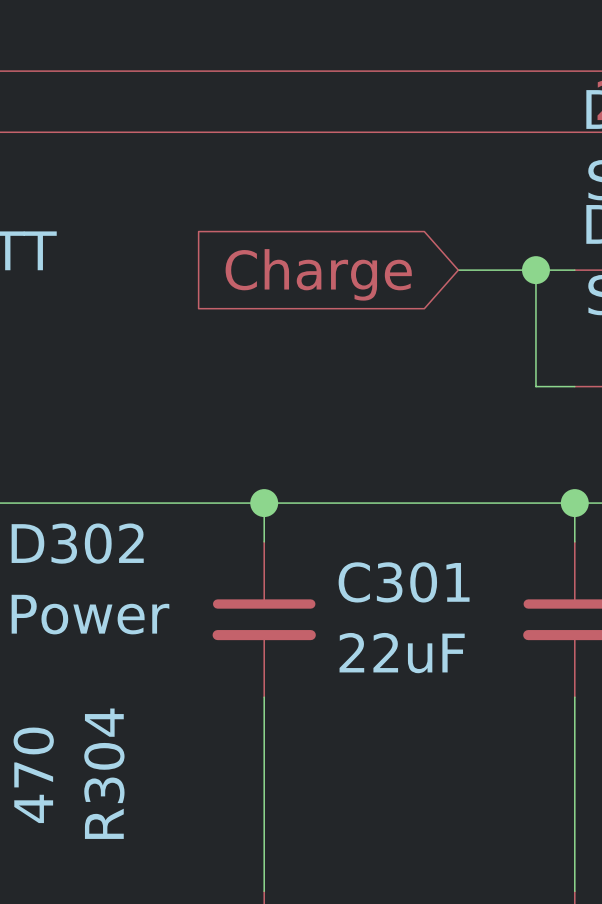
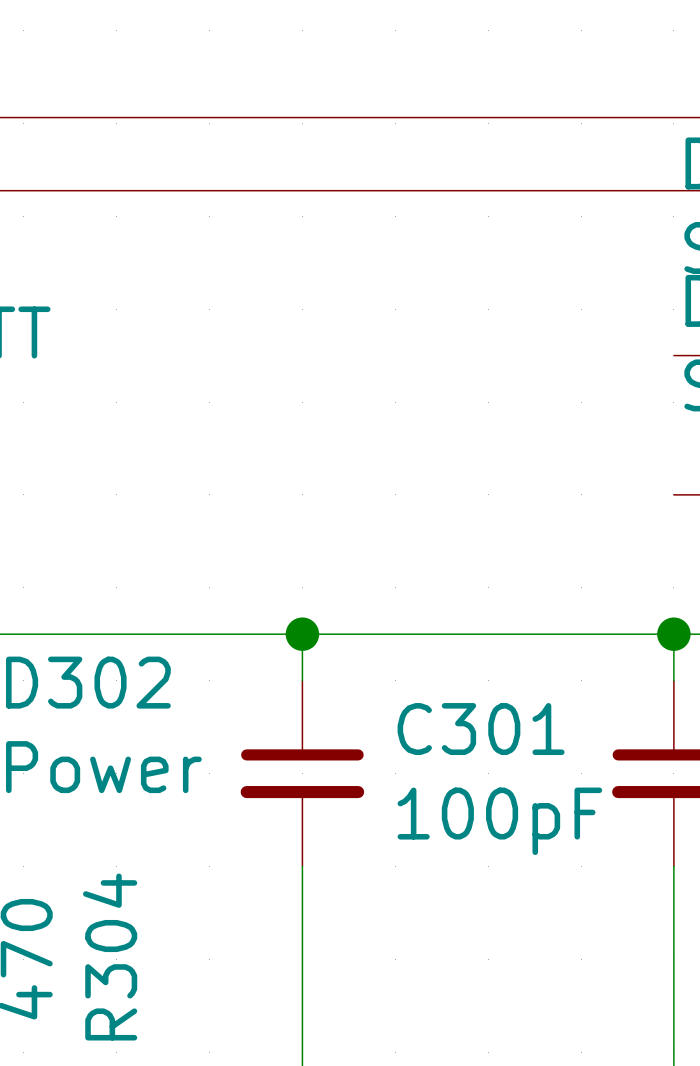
wire: (458, 270) (574, 270) -> none
wire: (535, 270) (535, 386) (574, 386) -> none
junction: (535, 270) -> none
global label: Charge (318, 274) -> none
C301 value: 22uF (402, 653) -> 100pF (499, 821)

